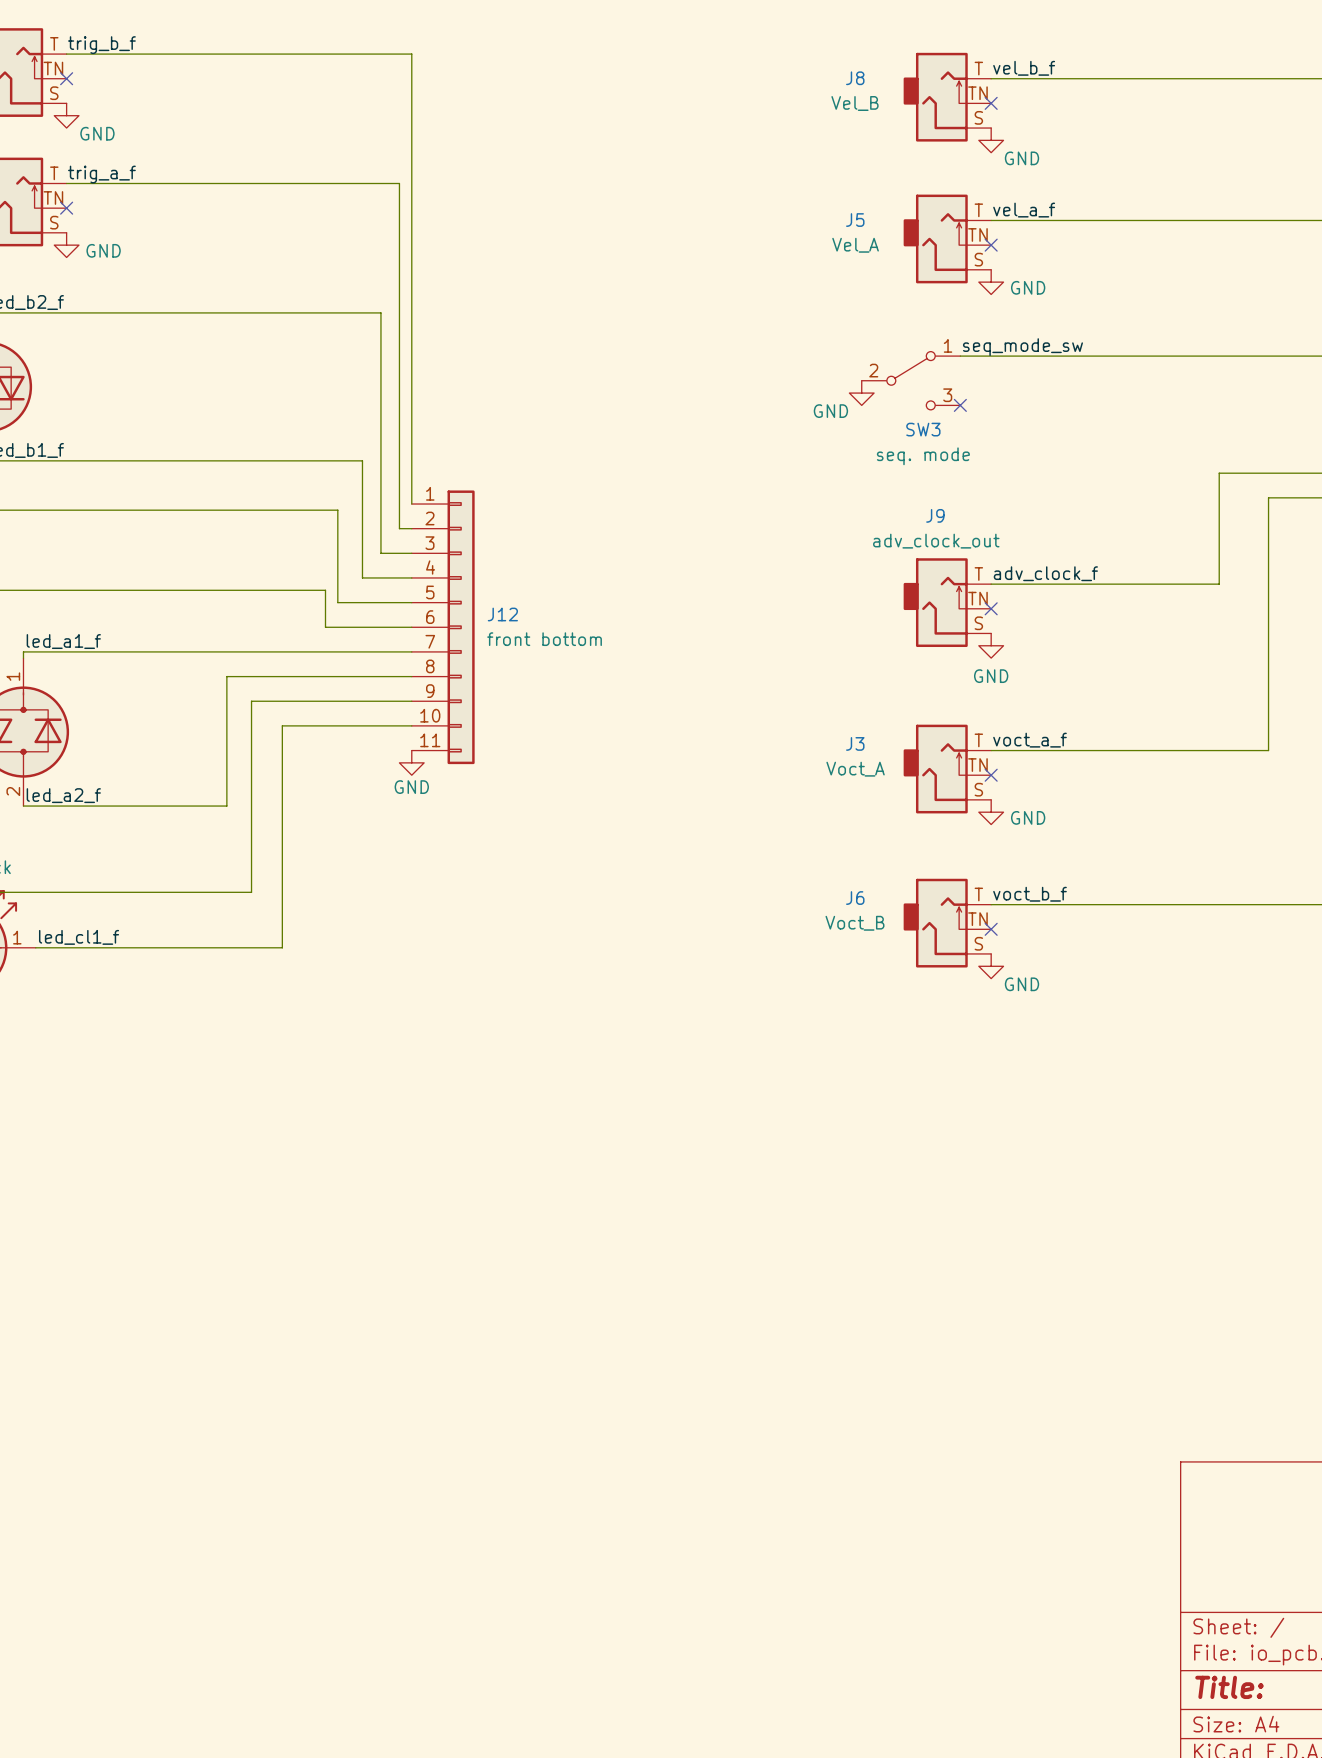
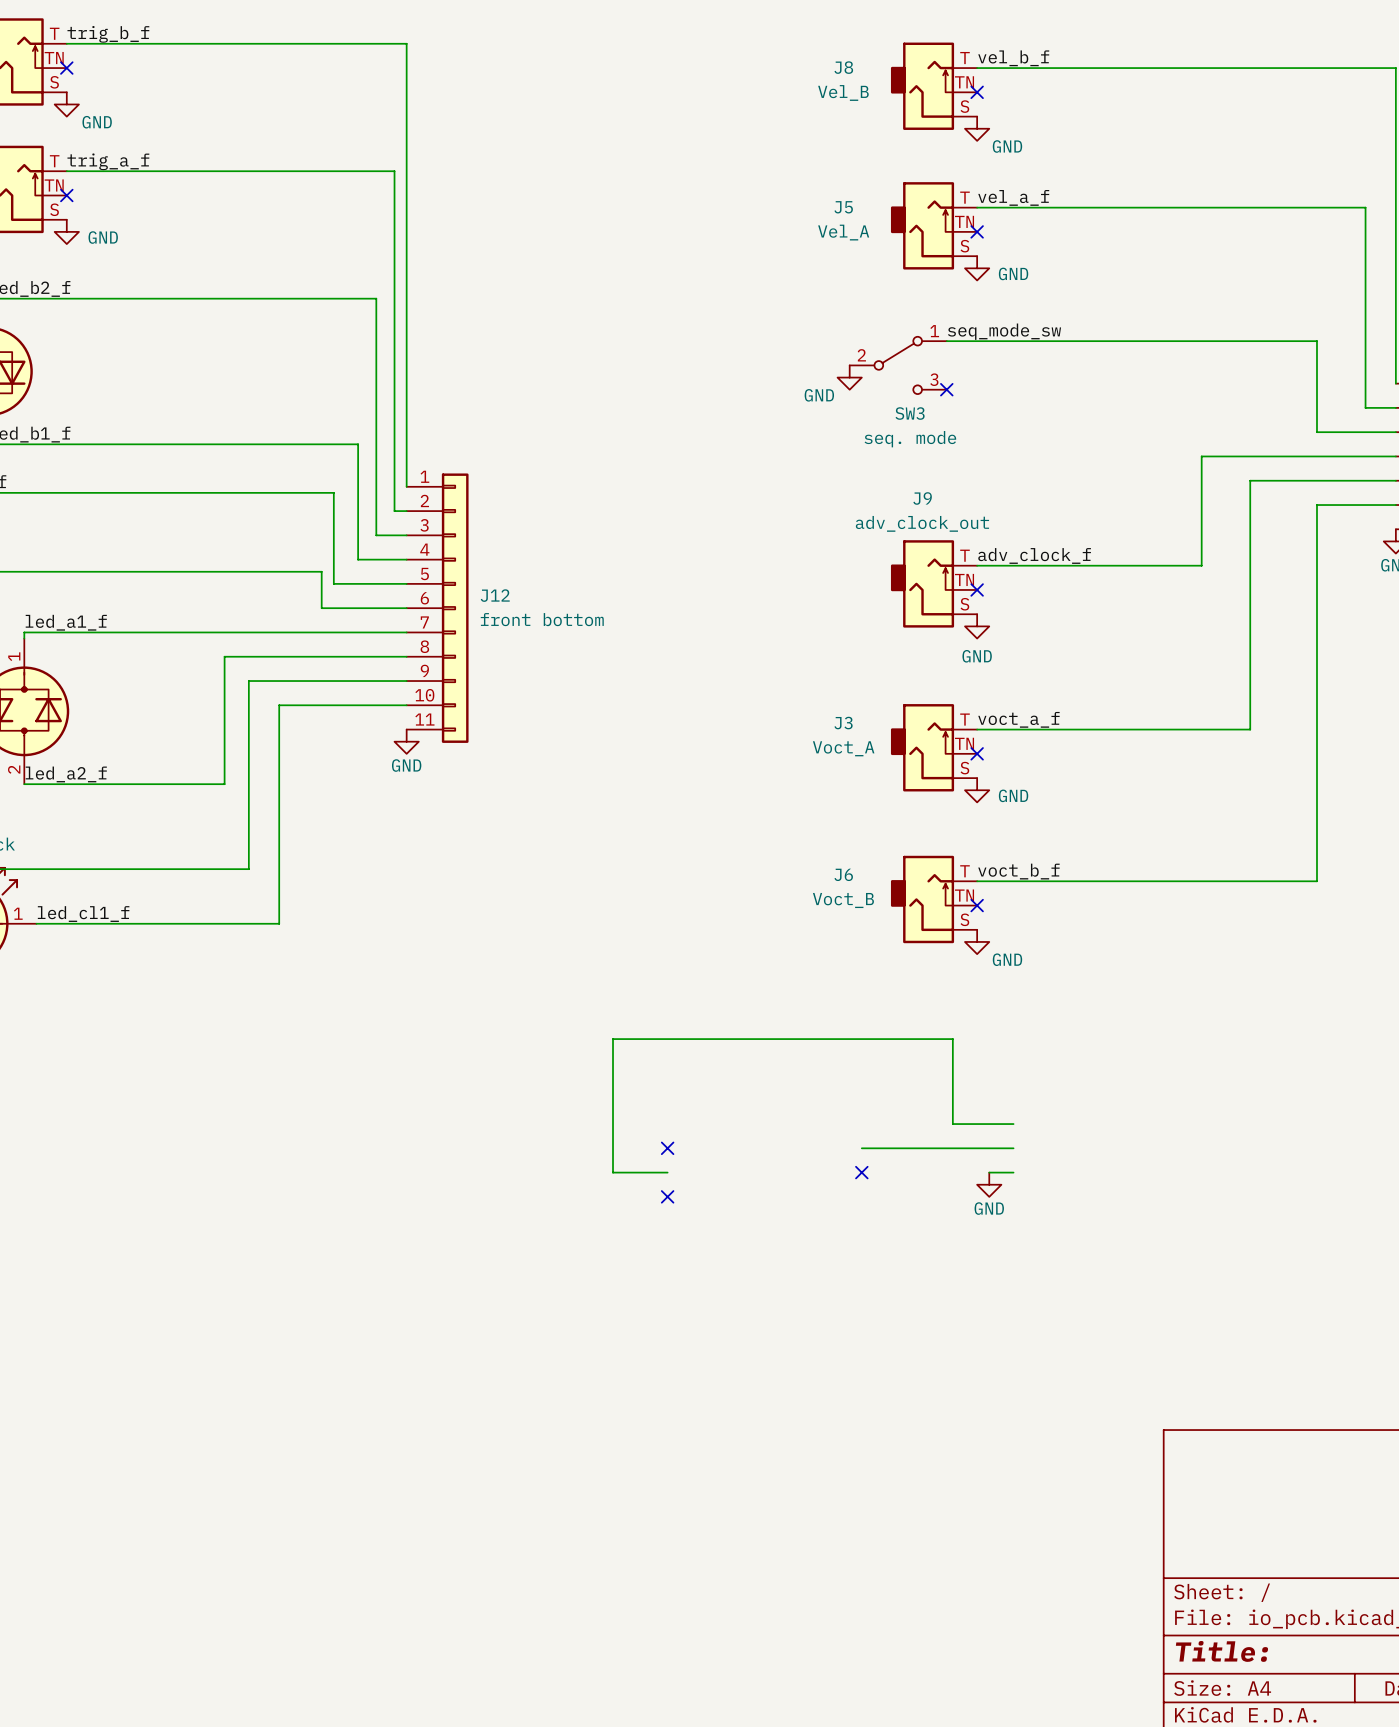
wire: none -> (1013, 1124) (952, 1124) (952, 1039) (613, 1039) (613, 1172) (667, 1172)
no-connect mark: none -> (667, 1148)
wire: none -> (861, 1148) (1013, 1148)
no-connect mark: none -> (861, 1172)
wire: none -> (989, 1172) (1013, 1172)
power symbol: none -> GND (989, 1184)
no-connect mark: none -> (667, 1196)

